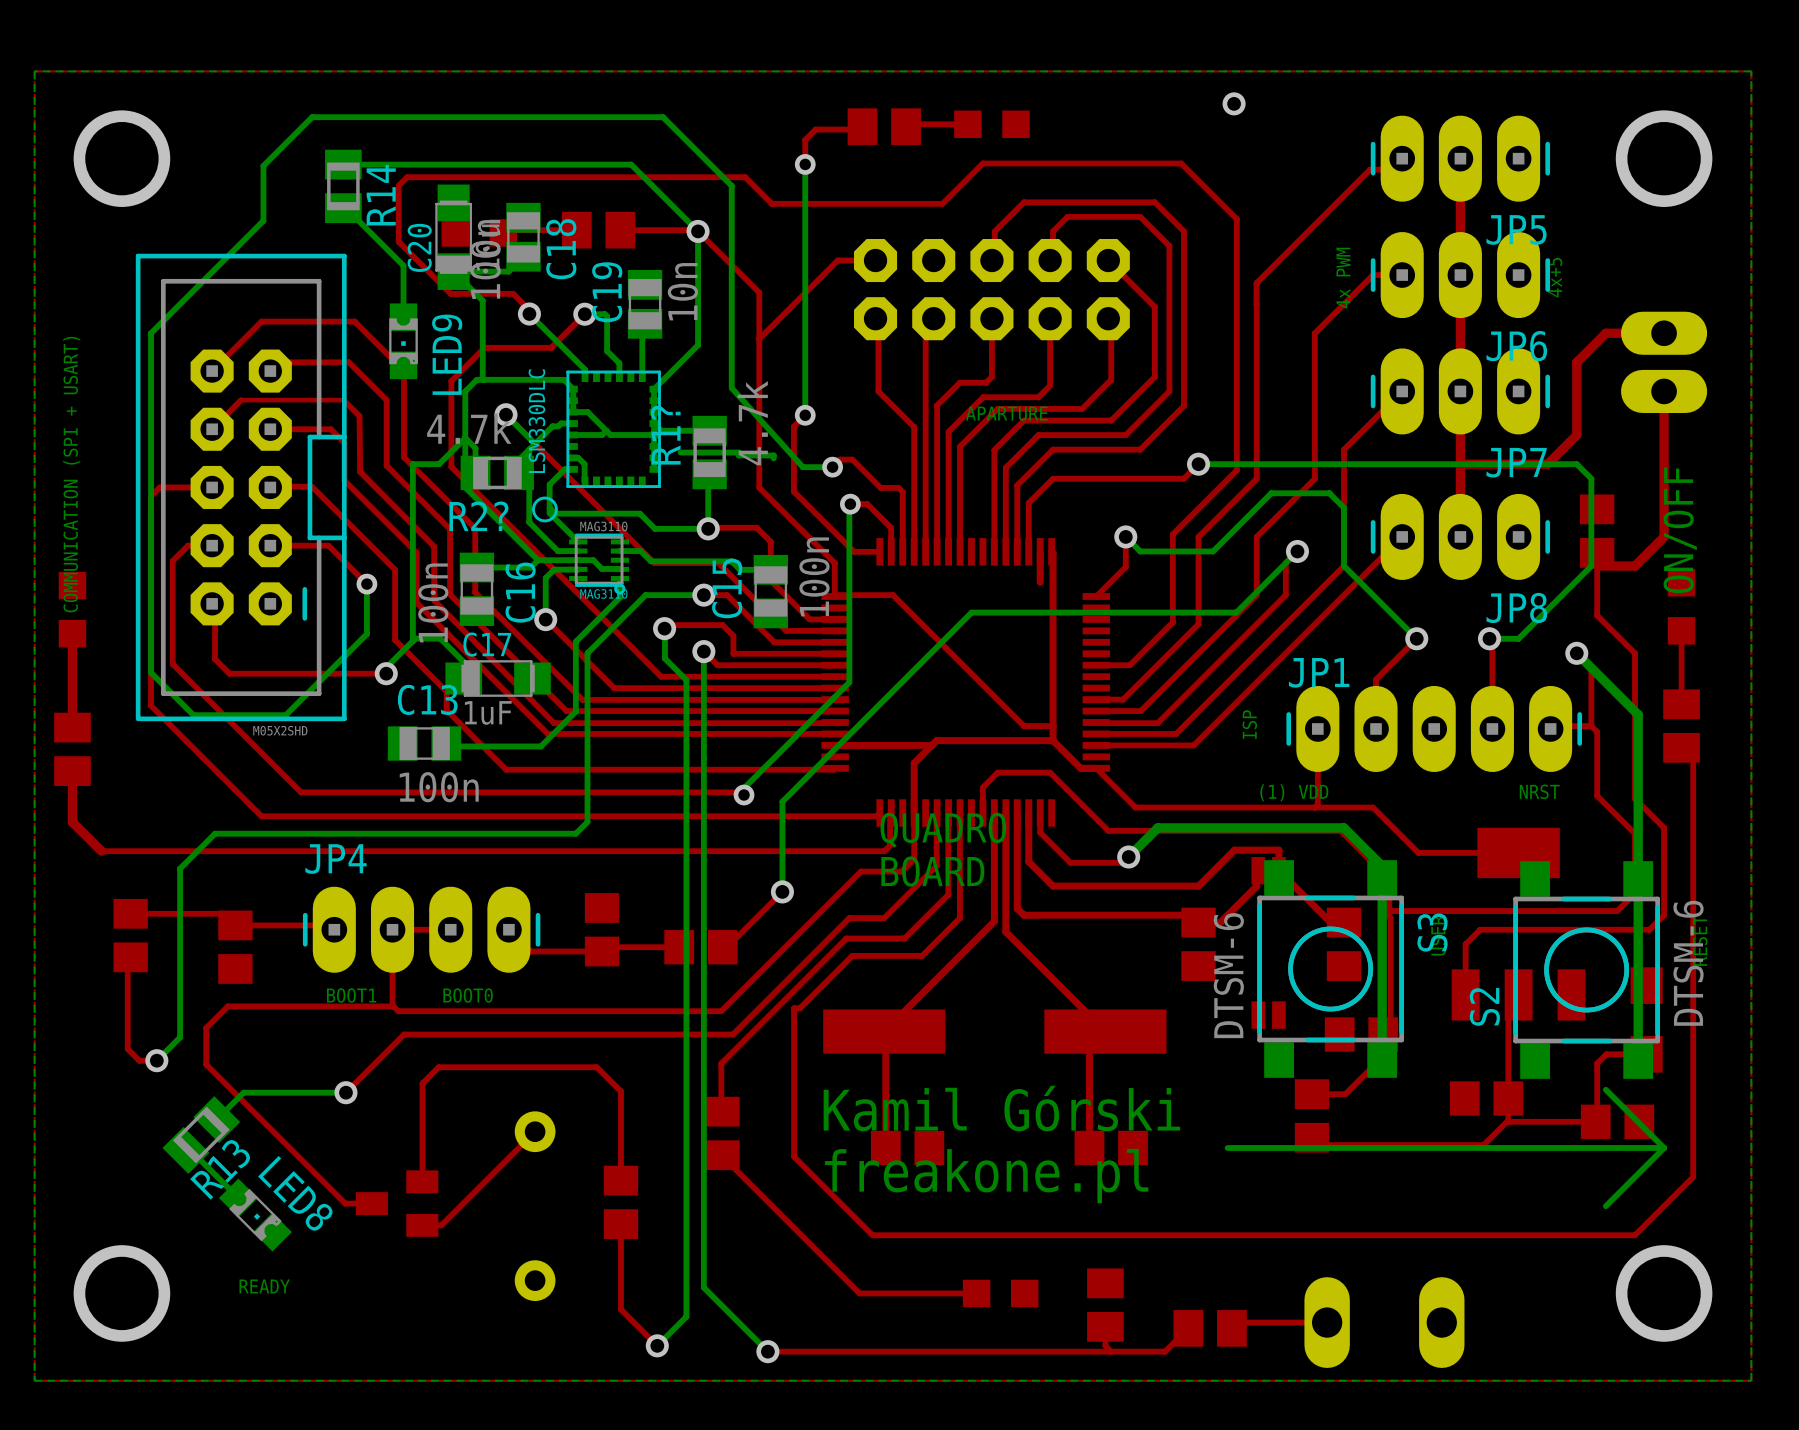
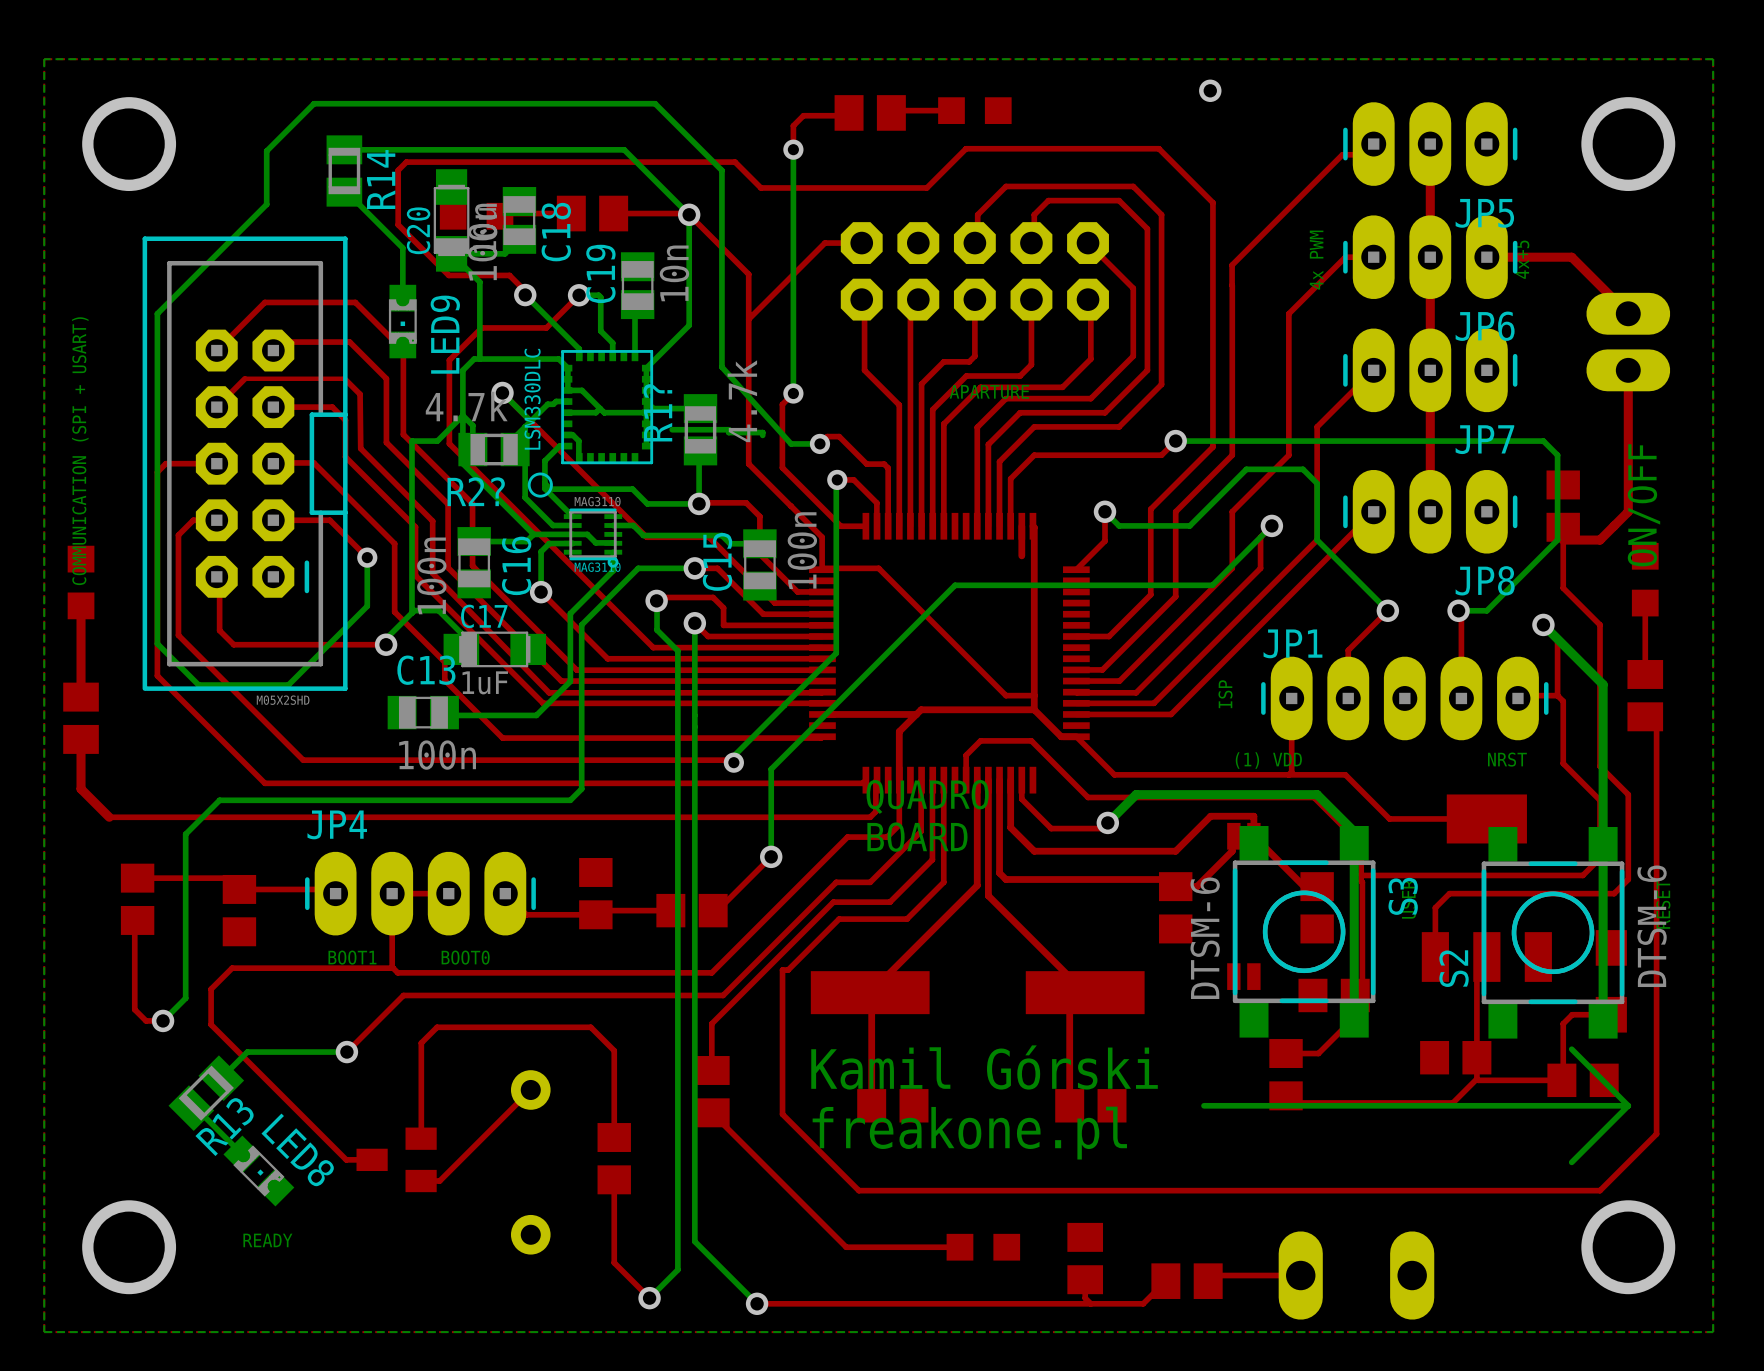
top track: (1664, 333) (1605, 333) (1576, 362) (1576, 435) (1547, 464) (1460, 464) -> (1628, 313) (1571, 257) (1486, 257)

